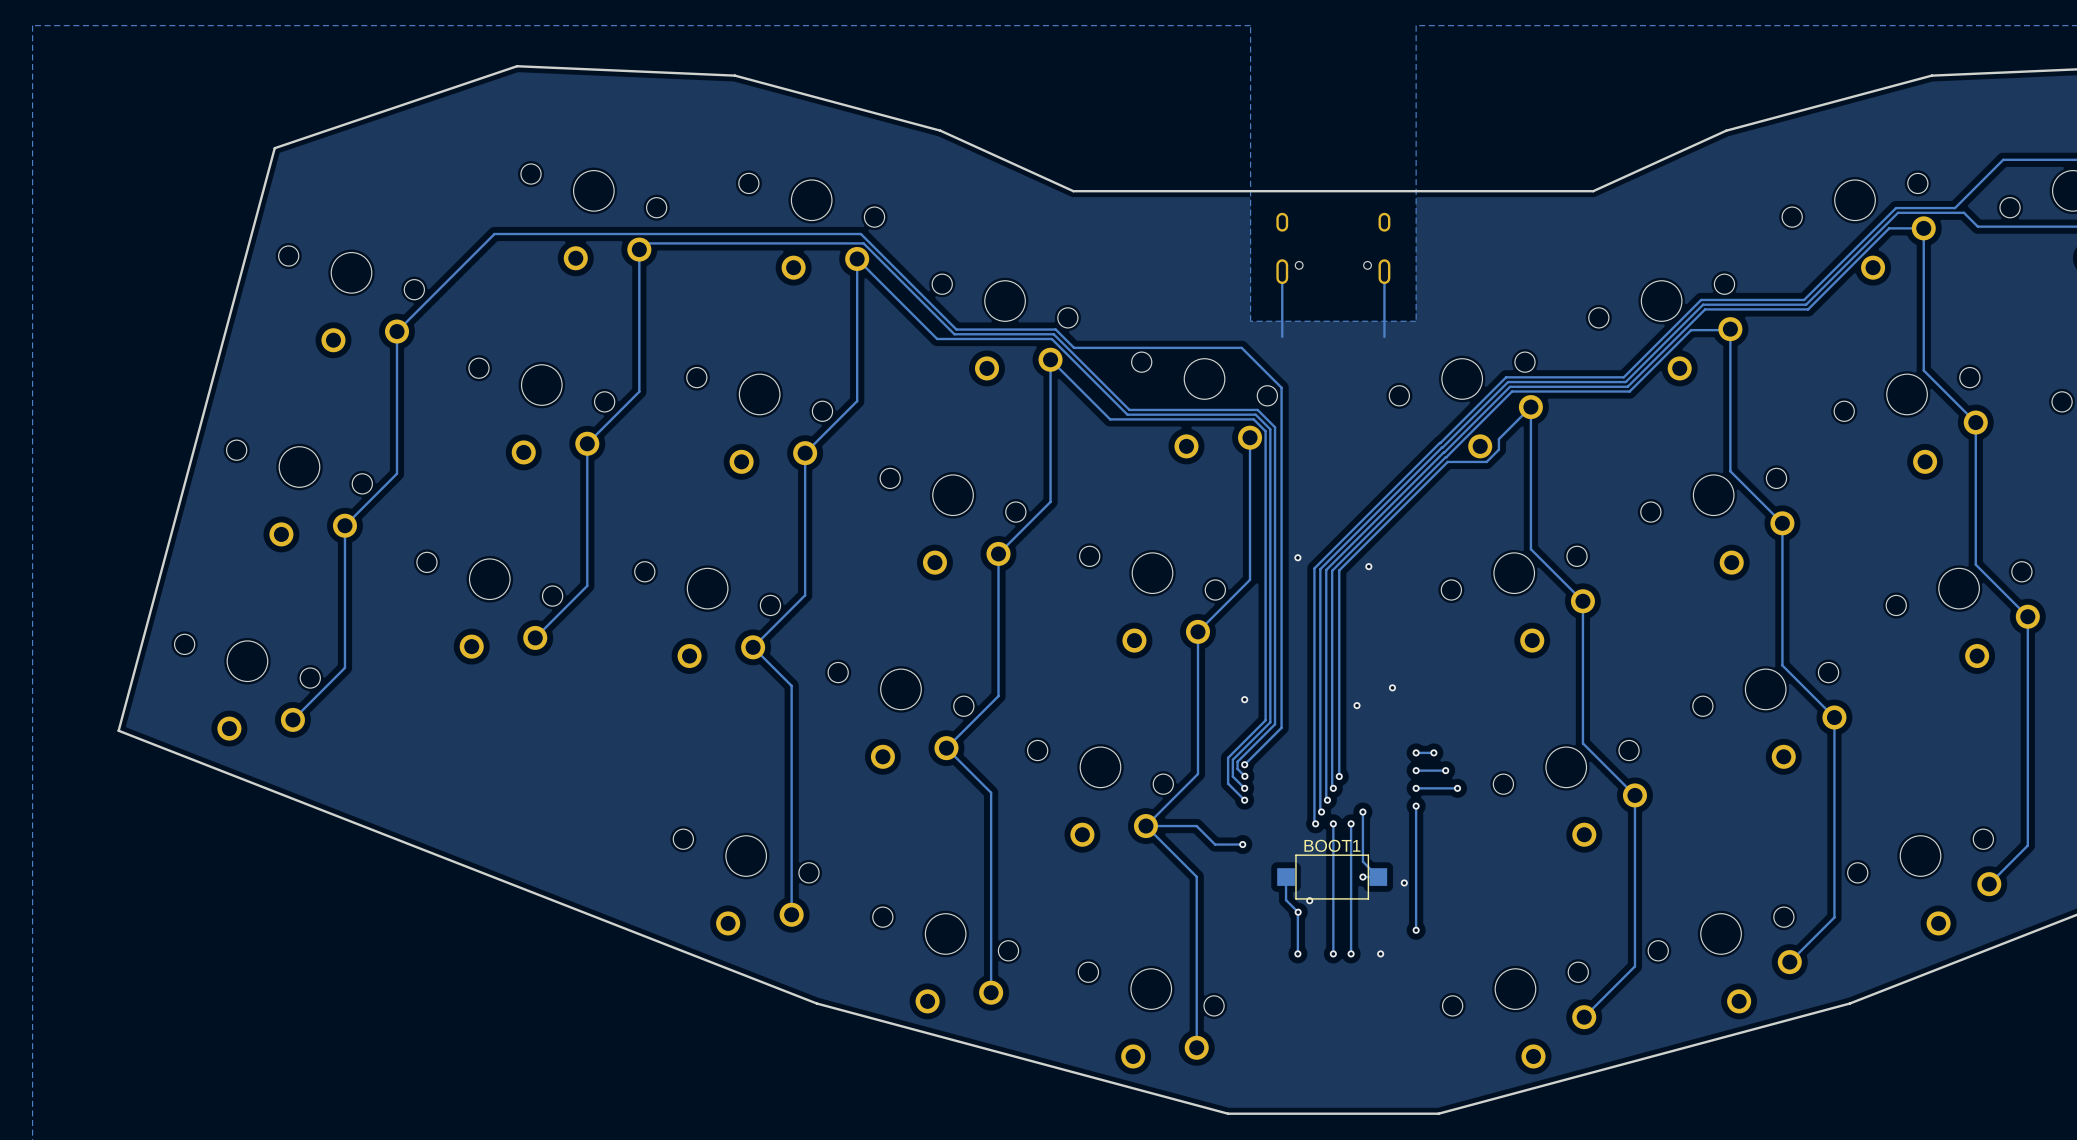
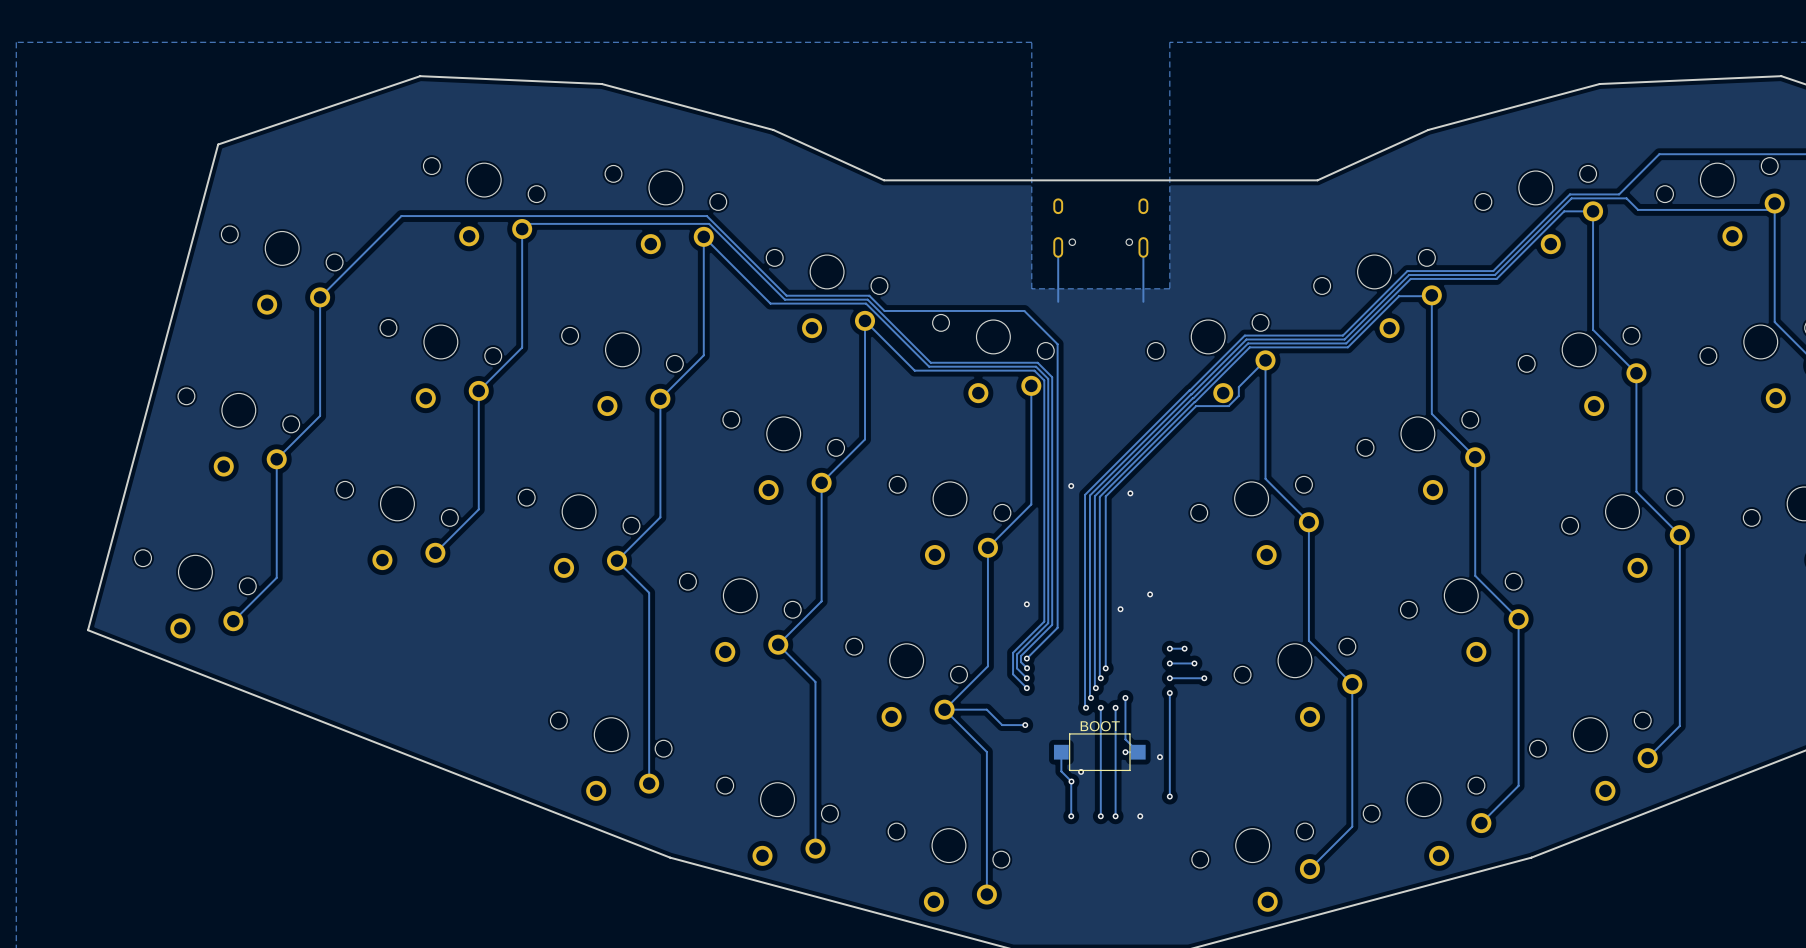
BOOT1 name: BOOT1 (1332, 845) -> BOOT (1100, 726)

